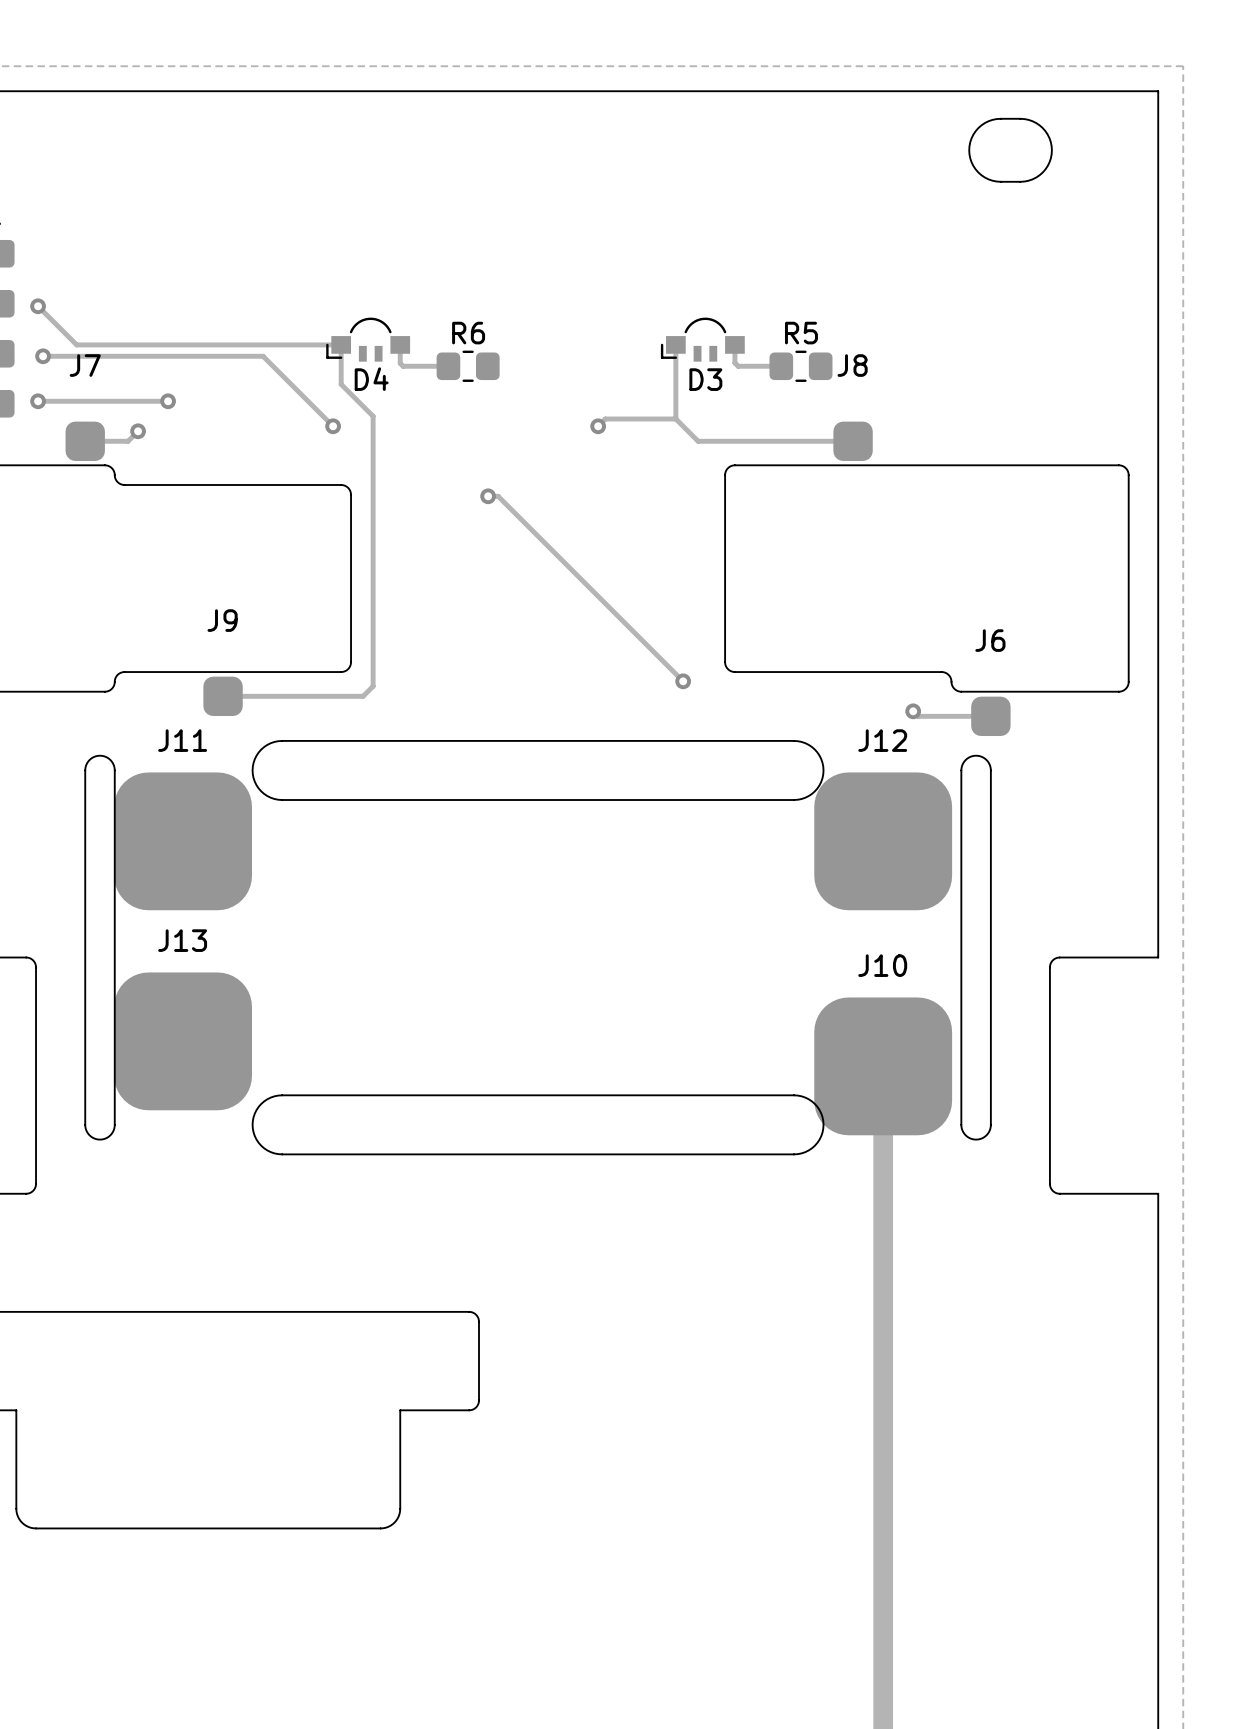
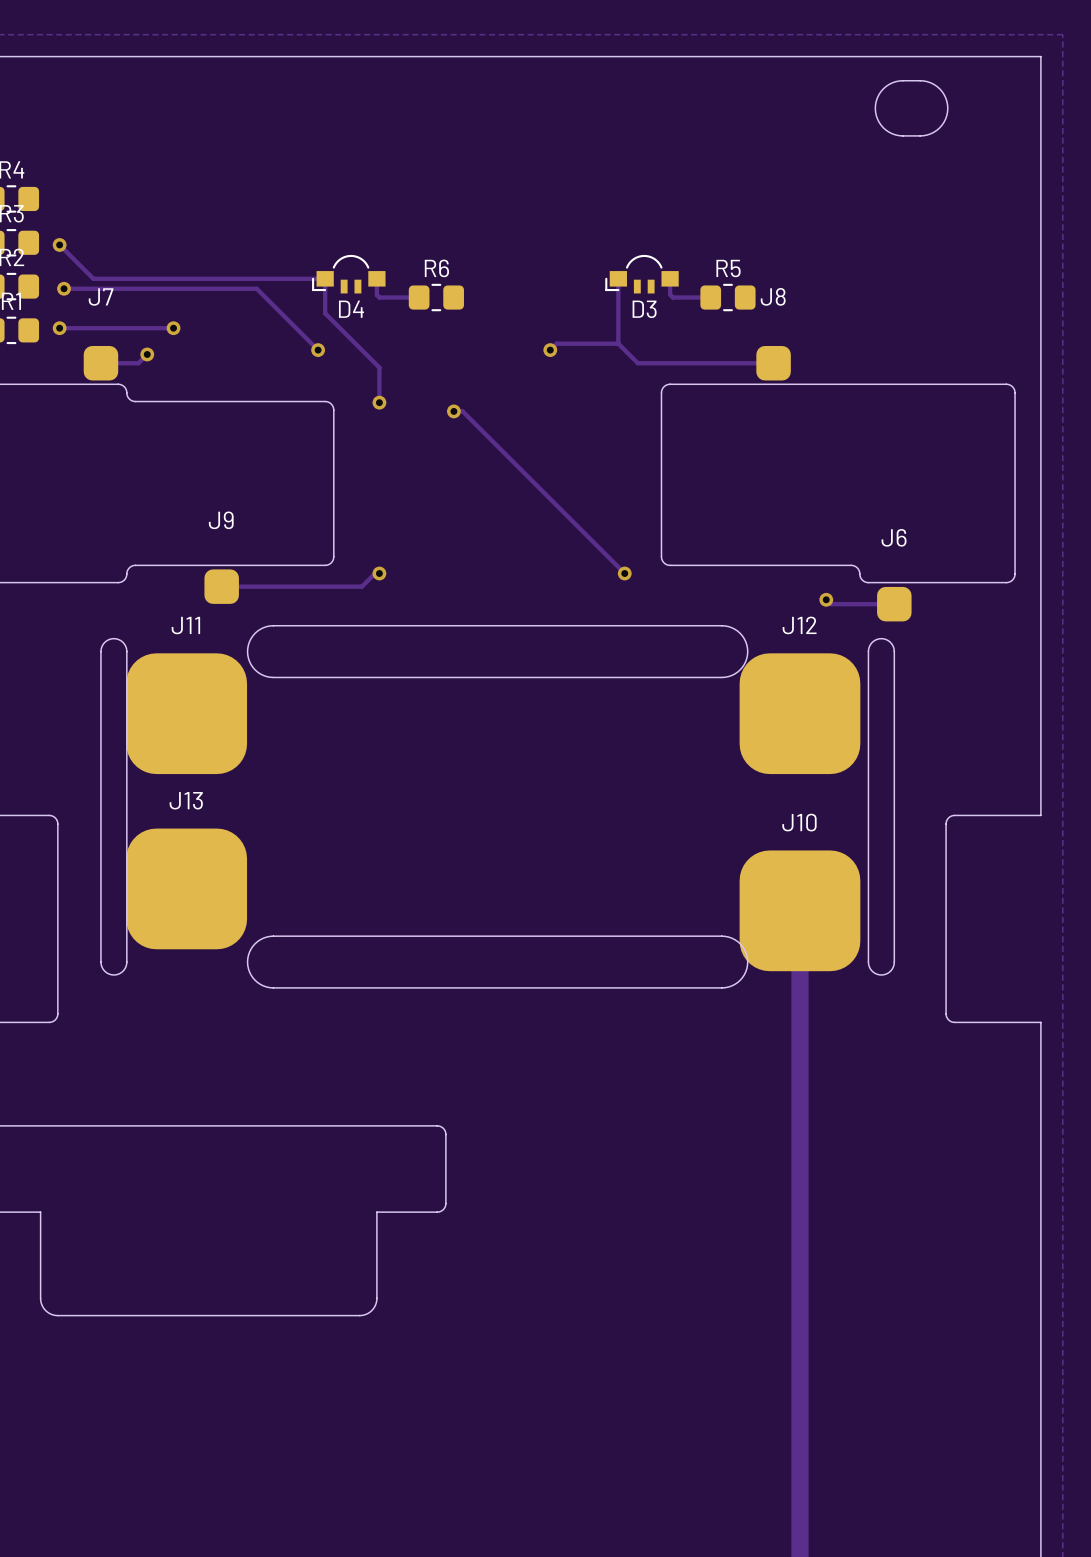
track: (373, 416) (373, 686) (363, 696) -> (353, 341) (379, 367) (379, 402)
via: none -> (379, 402)
track: none -> (379, 573) (375, 573) (361, 586) (344, 586)
via: none -> (379, 573)

